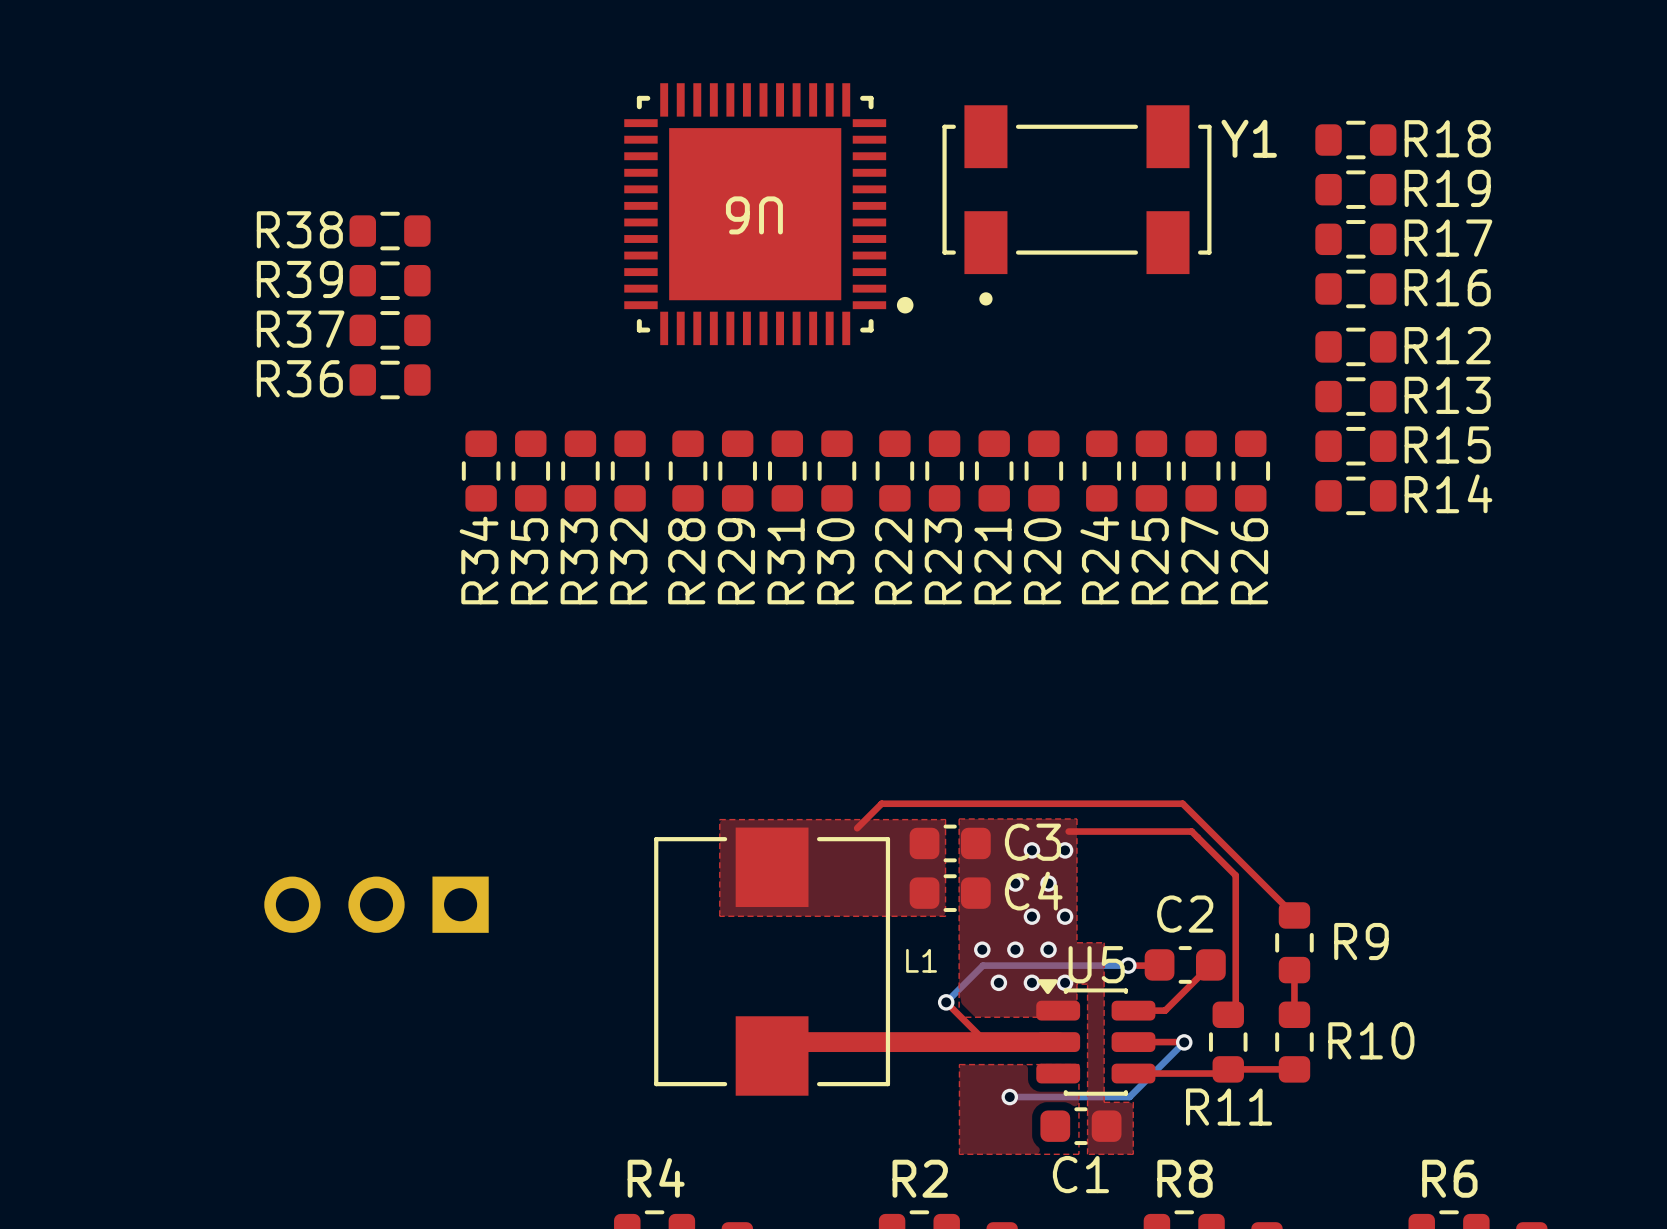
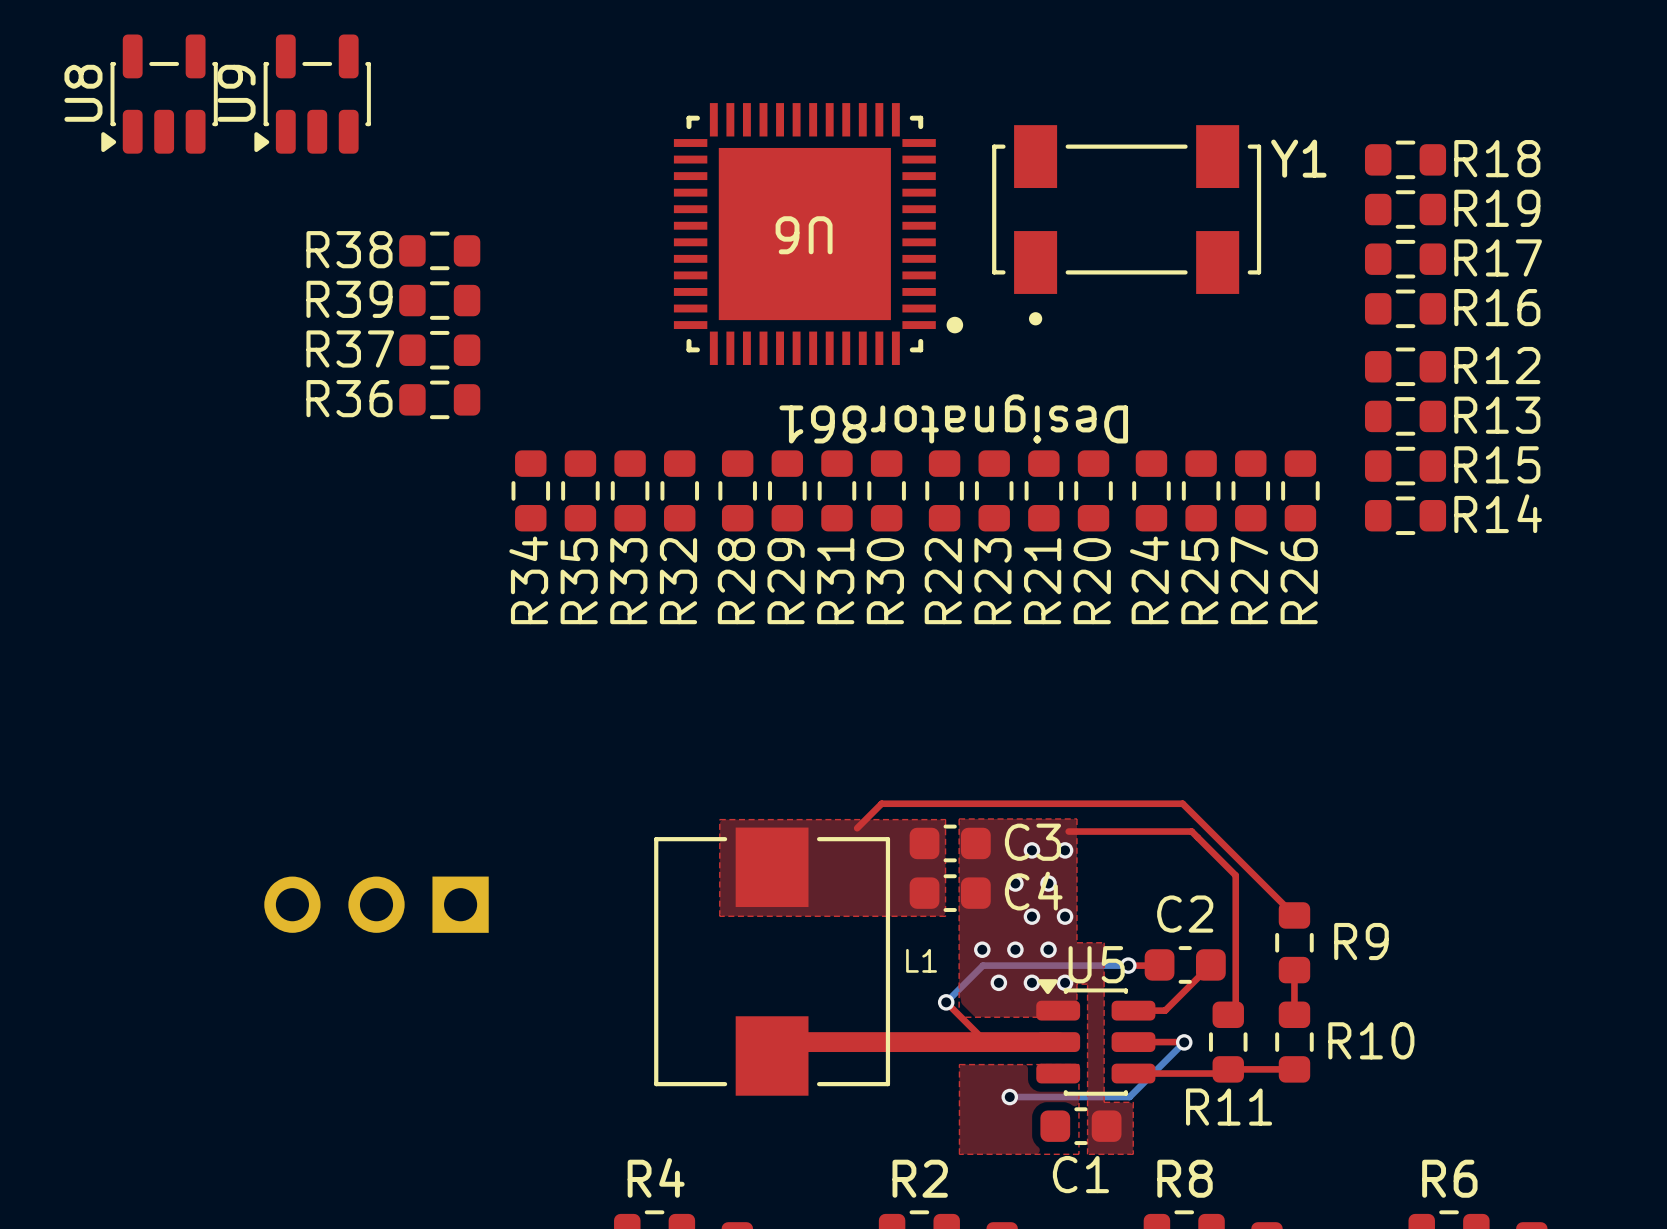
U8: none -> (159, 94)
U9: none -> (312, 94)
R18 position: (1355, 140) -> (1405, 159)
R19 position: (1355, 189) -> (1405, 209)
Y1 position: (1076, 205) -> (1126, 225)
U6 position: (768, 214) -> (818, 234)
R38 position: (390, 231) -> (439, 250)
R17 position: (1355, 239) -> (1405, 259)
R39 position: (390, 280) -> (439, 300)
R16 position: (1355, 288) -> (1405, 308)
R37 position: (390, 330) -> (439, 350)
R12 position: (1355, 346) -> (1405, 366)
R36 position: (390, 380) -> (439, 399)
R13 position: (1355, 396) -> (1405, 416)
U6 text: none -> Designator861 (953, 418)
R15 position: (1355, 446) -> (1405, 466)
R34 position: (481, 471) -> (530, 490)
R35 position: (530, 471) -> (580, 490)
R33 position: (580, 471) -> (630, 490)
R32 position: (630, 471) -> (679, 490)
R28 position: (688, 471) -> (737, 490)
R29 position: (737, 471) -> (787, 490)
R31 position: (787, 471) -> (836, 490)
R30 position: (836, 471) -> (886, 490)
R22 position: (894, 471) -> (944, 490)
R23 position: (944, 471) -> (994, 490)
R21 position: (994, 471) -> (1043, 490)
R20 position: (1043, 471) -> (1093, 490)
R24 position: (1101, 471) -> (1151, 490)
R25 position: (1151, 471) -> (1201, 490)
R27 position: (1201, 471) -> (1250, 490)
R26 position: (1250, 471) -> (1300, 490)
R14 position: (1355, 495) -> (1405, 515)

